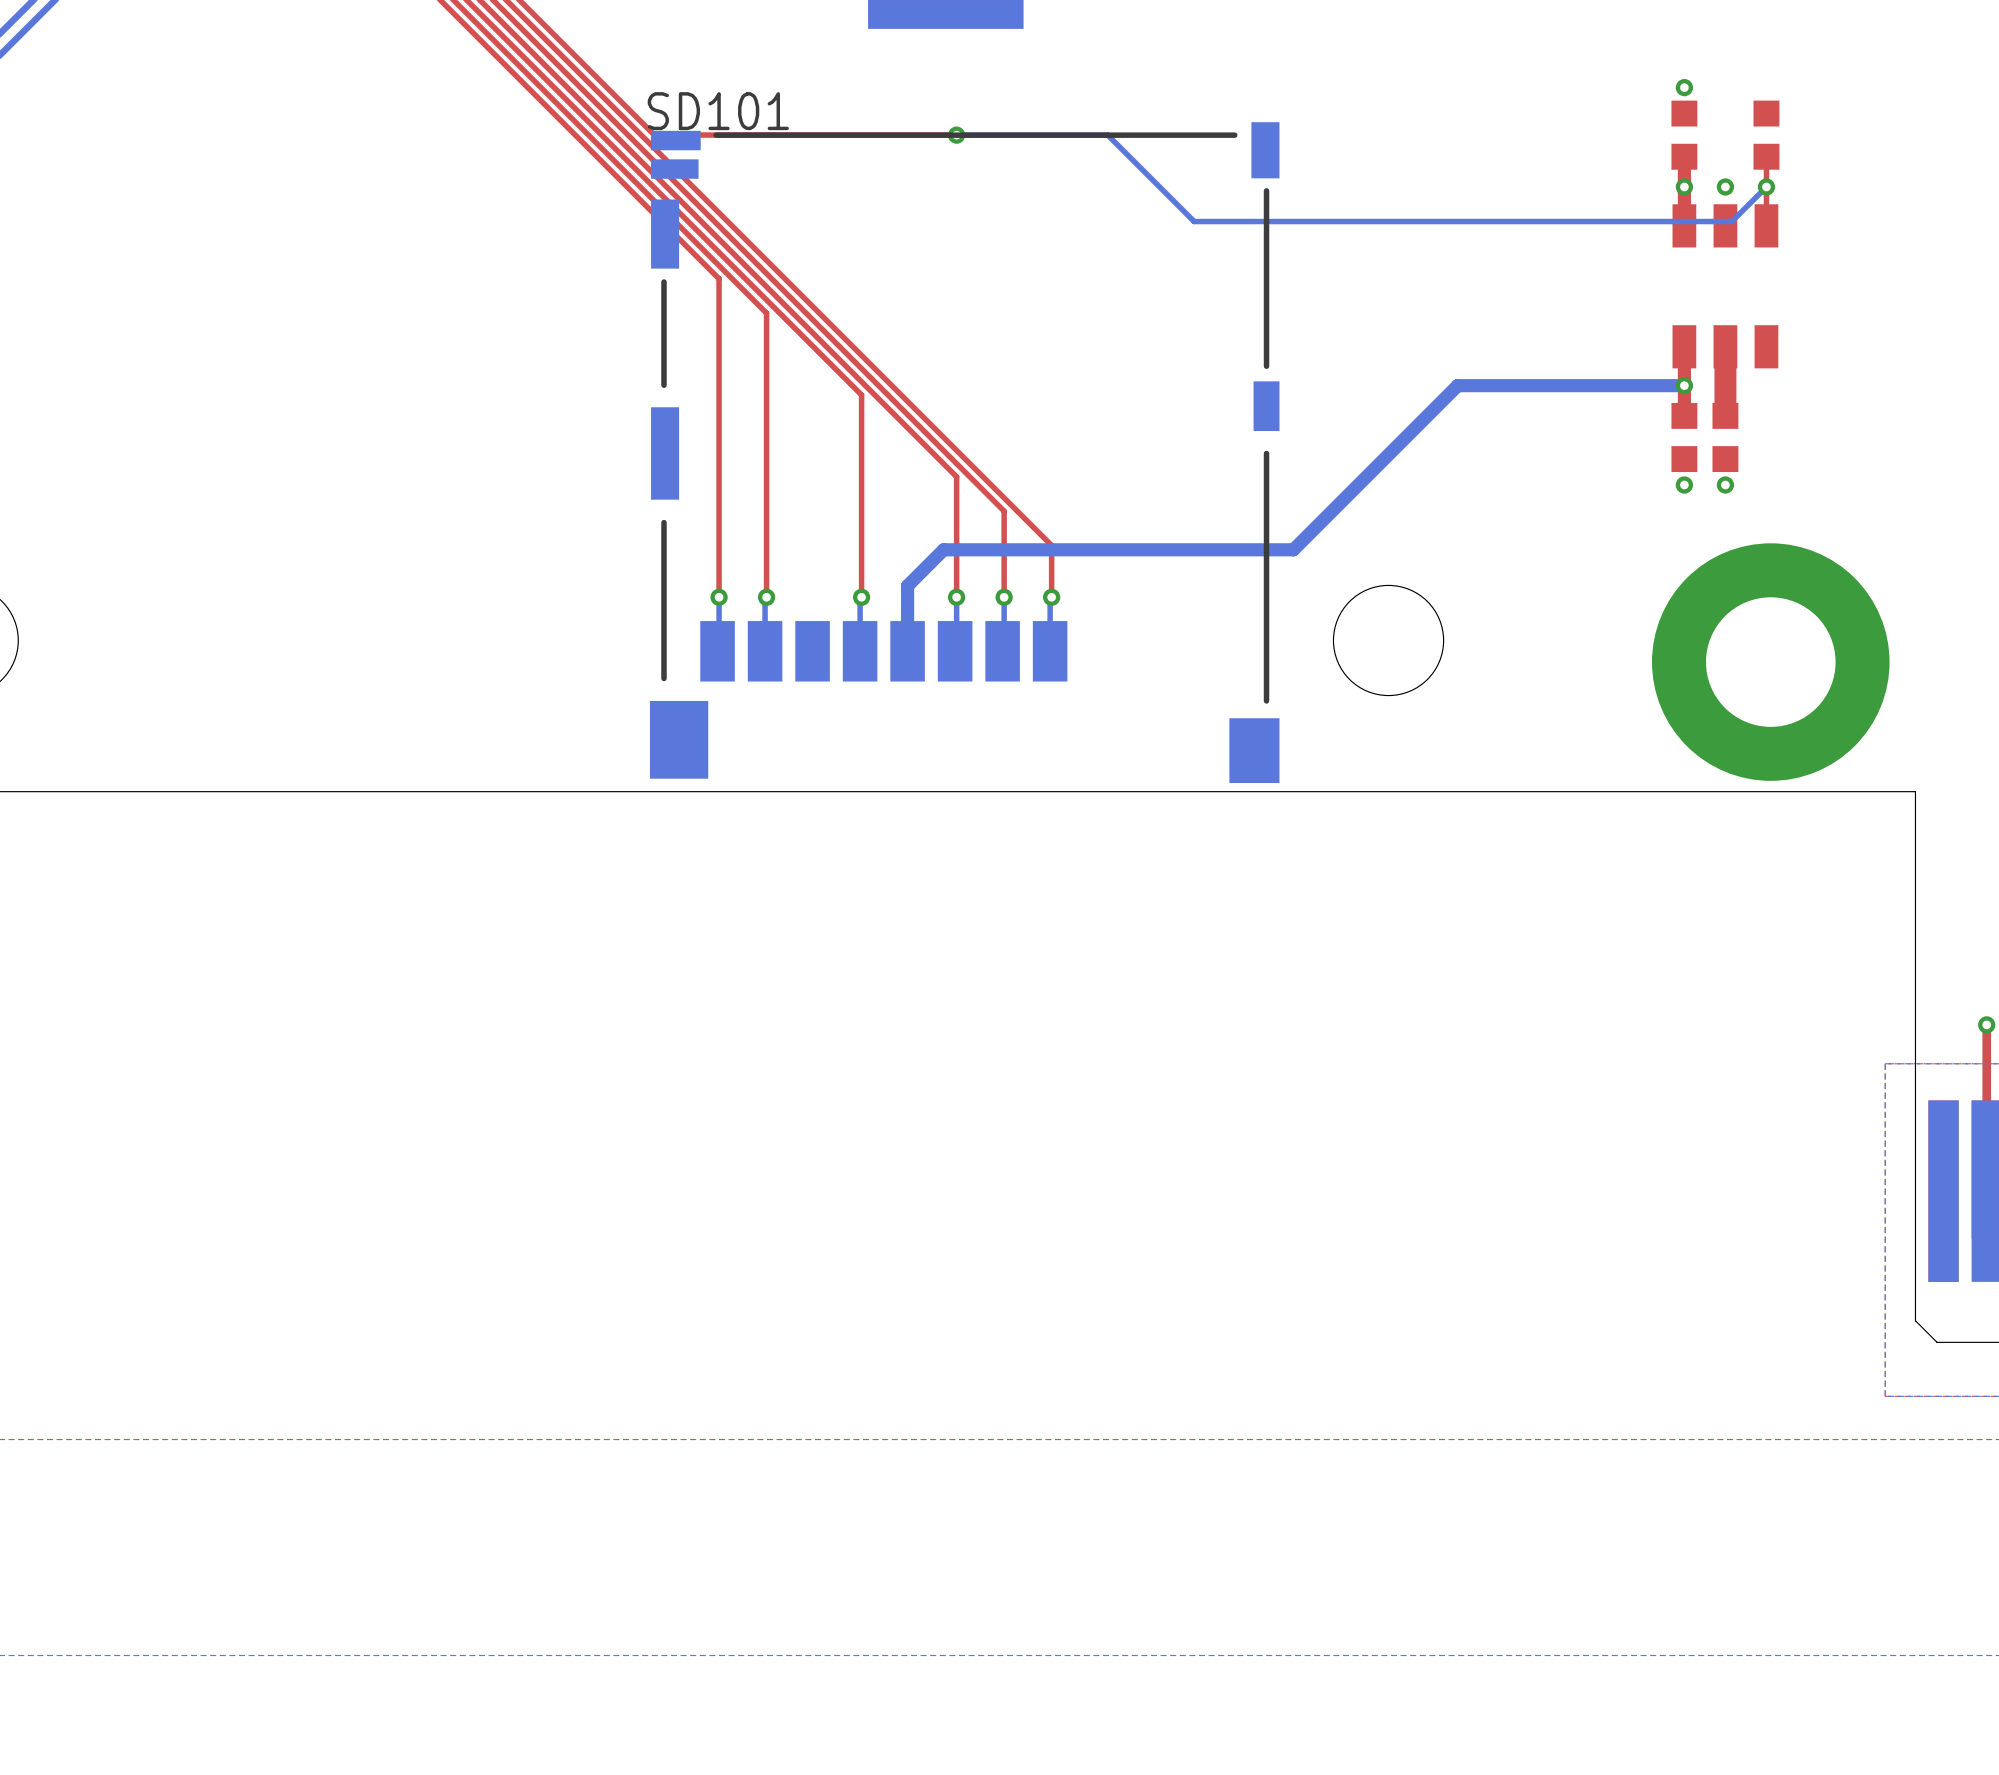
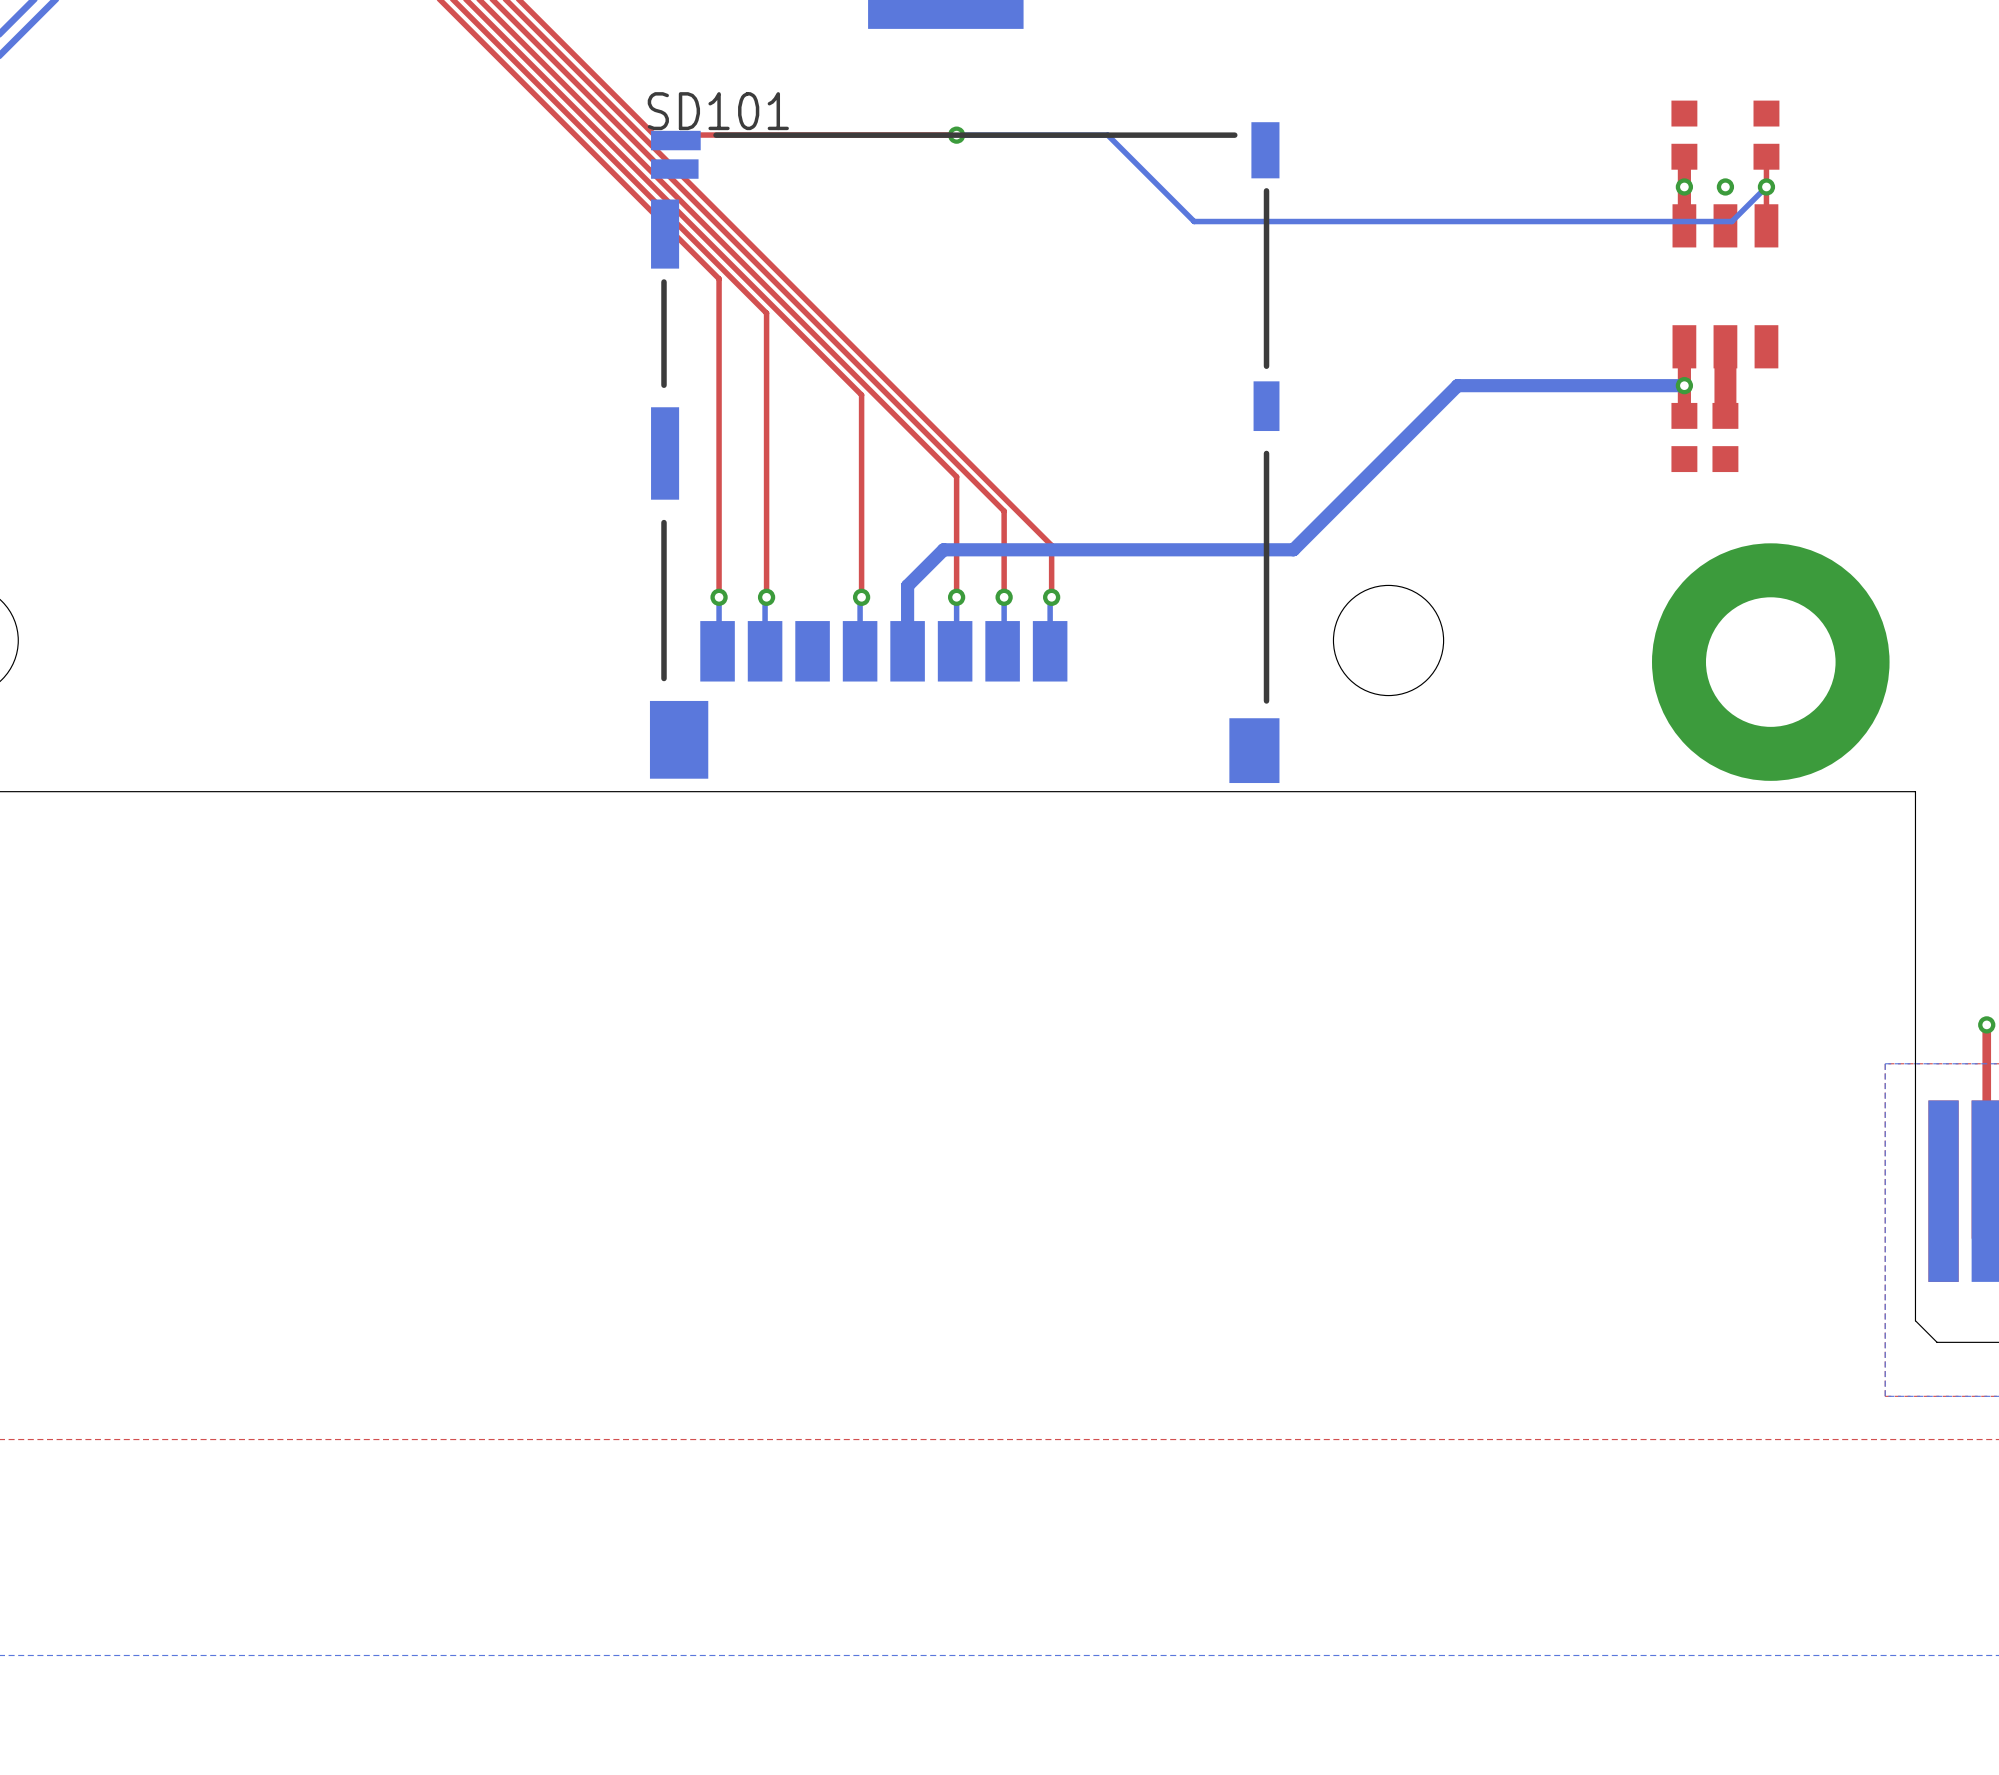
via: (1684, 87) -> none
via: (1684, 485) -> none
via: (1725, 485) -> none

